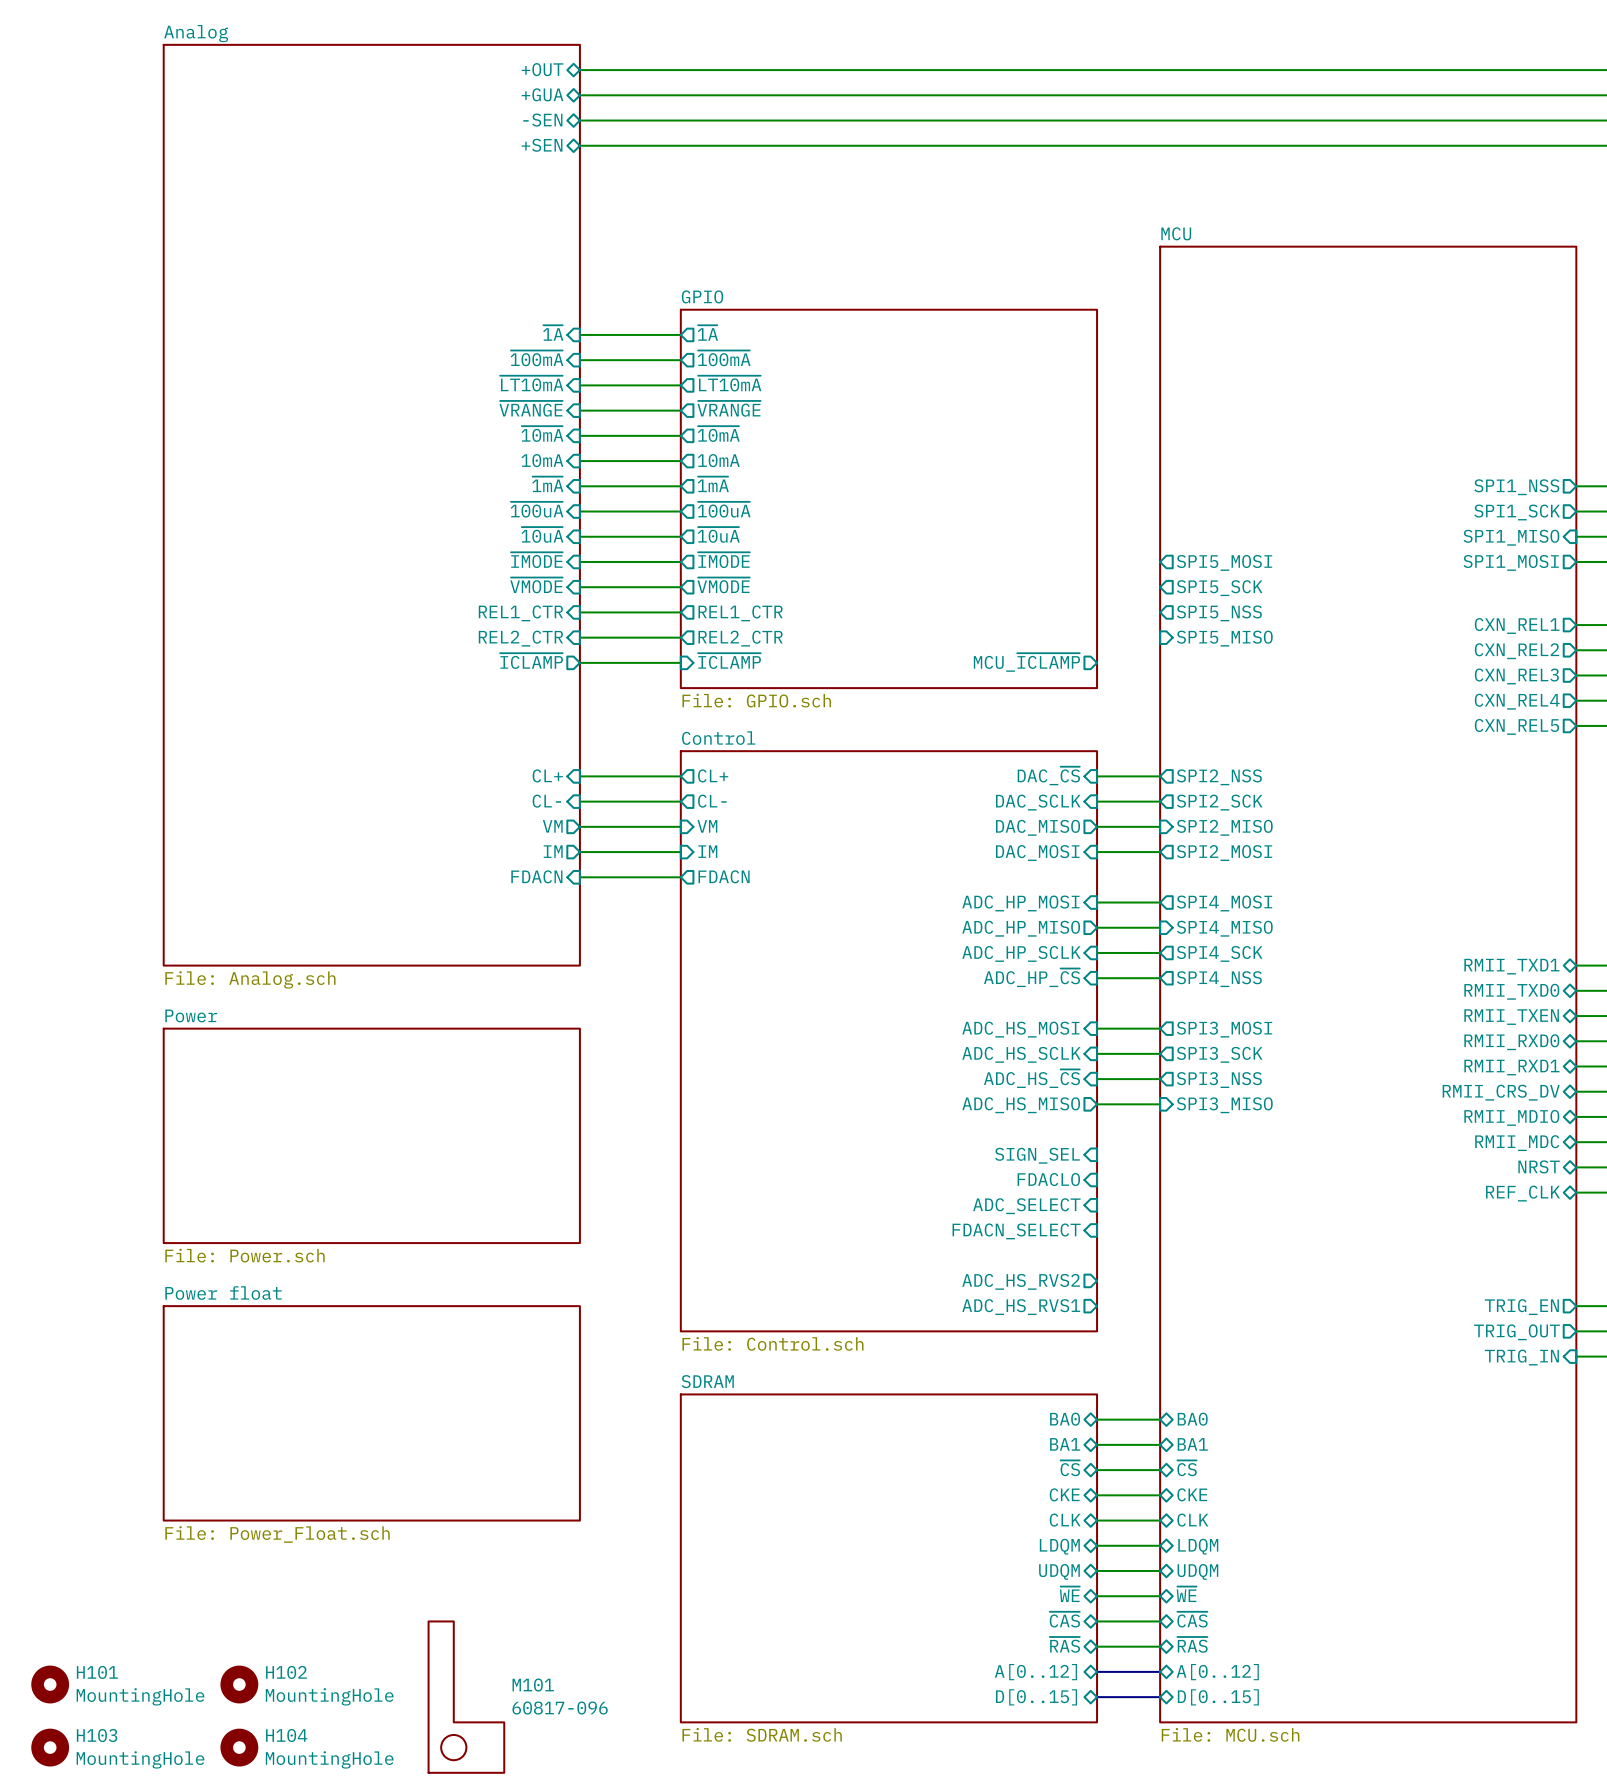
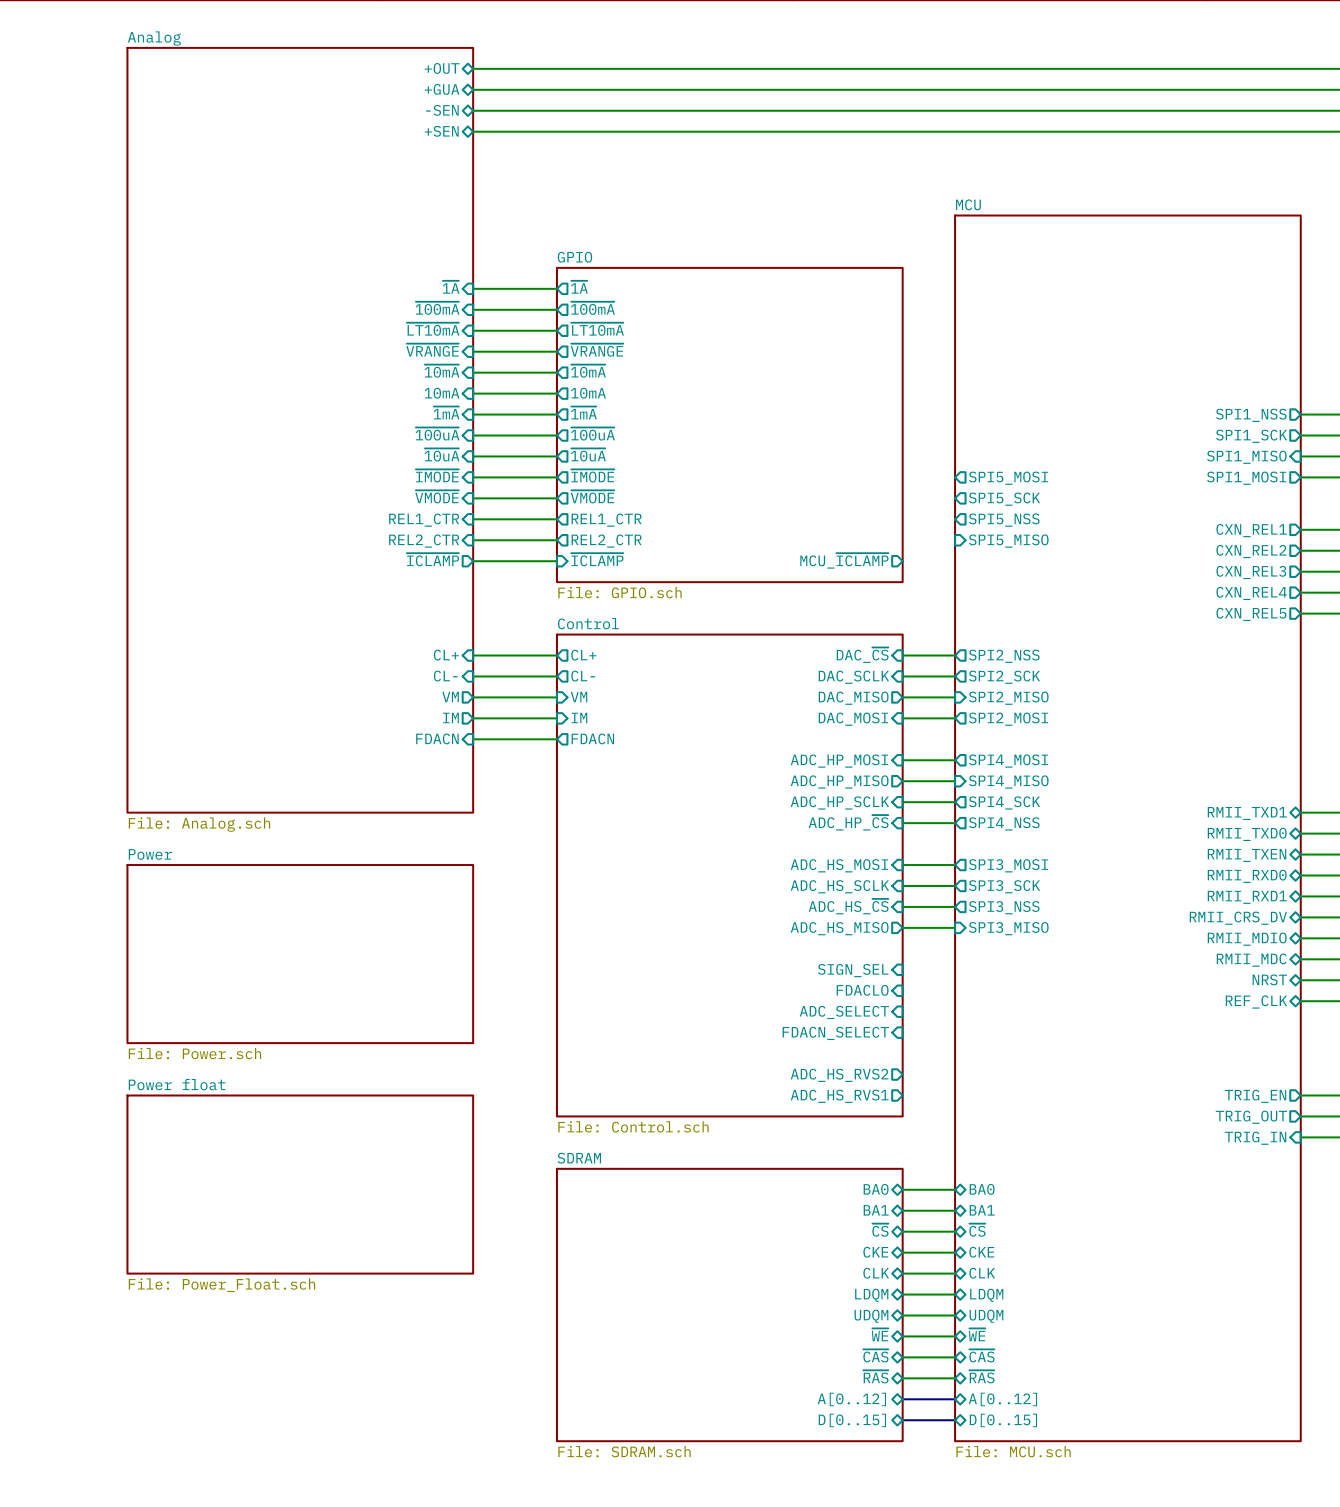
H101: MountingHole (50, 1684) -> none
H102: MountingHole (239, 1684) -> none
M101: 60817-096 (466, 1697) -> none
H103: MountingHole (50, 1747) -> none
H104: MountingHole (239, 1747) -> none

